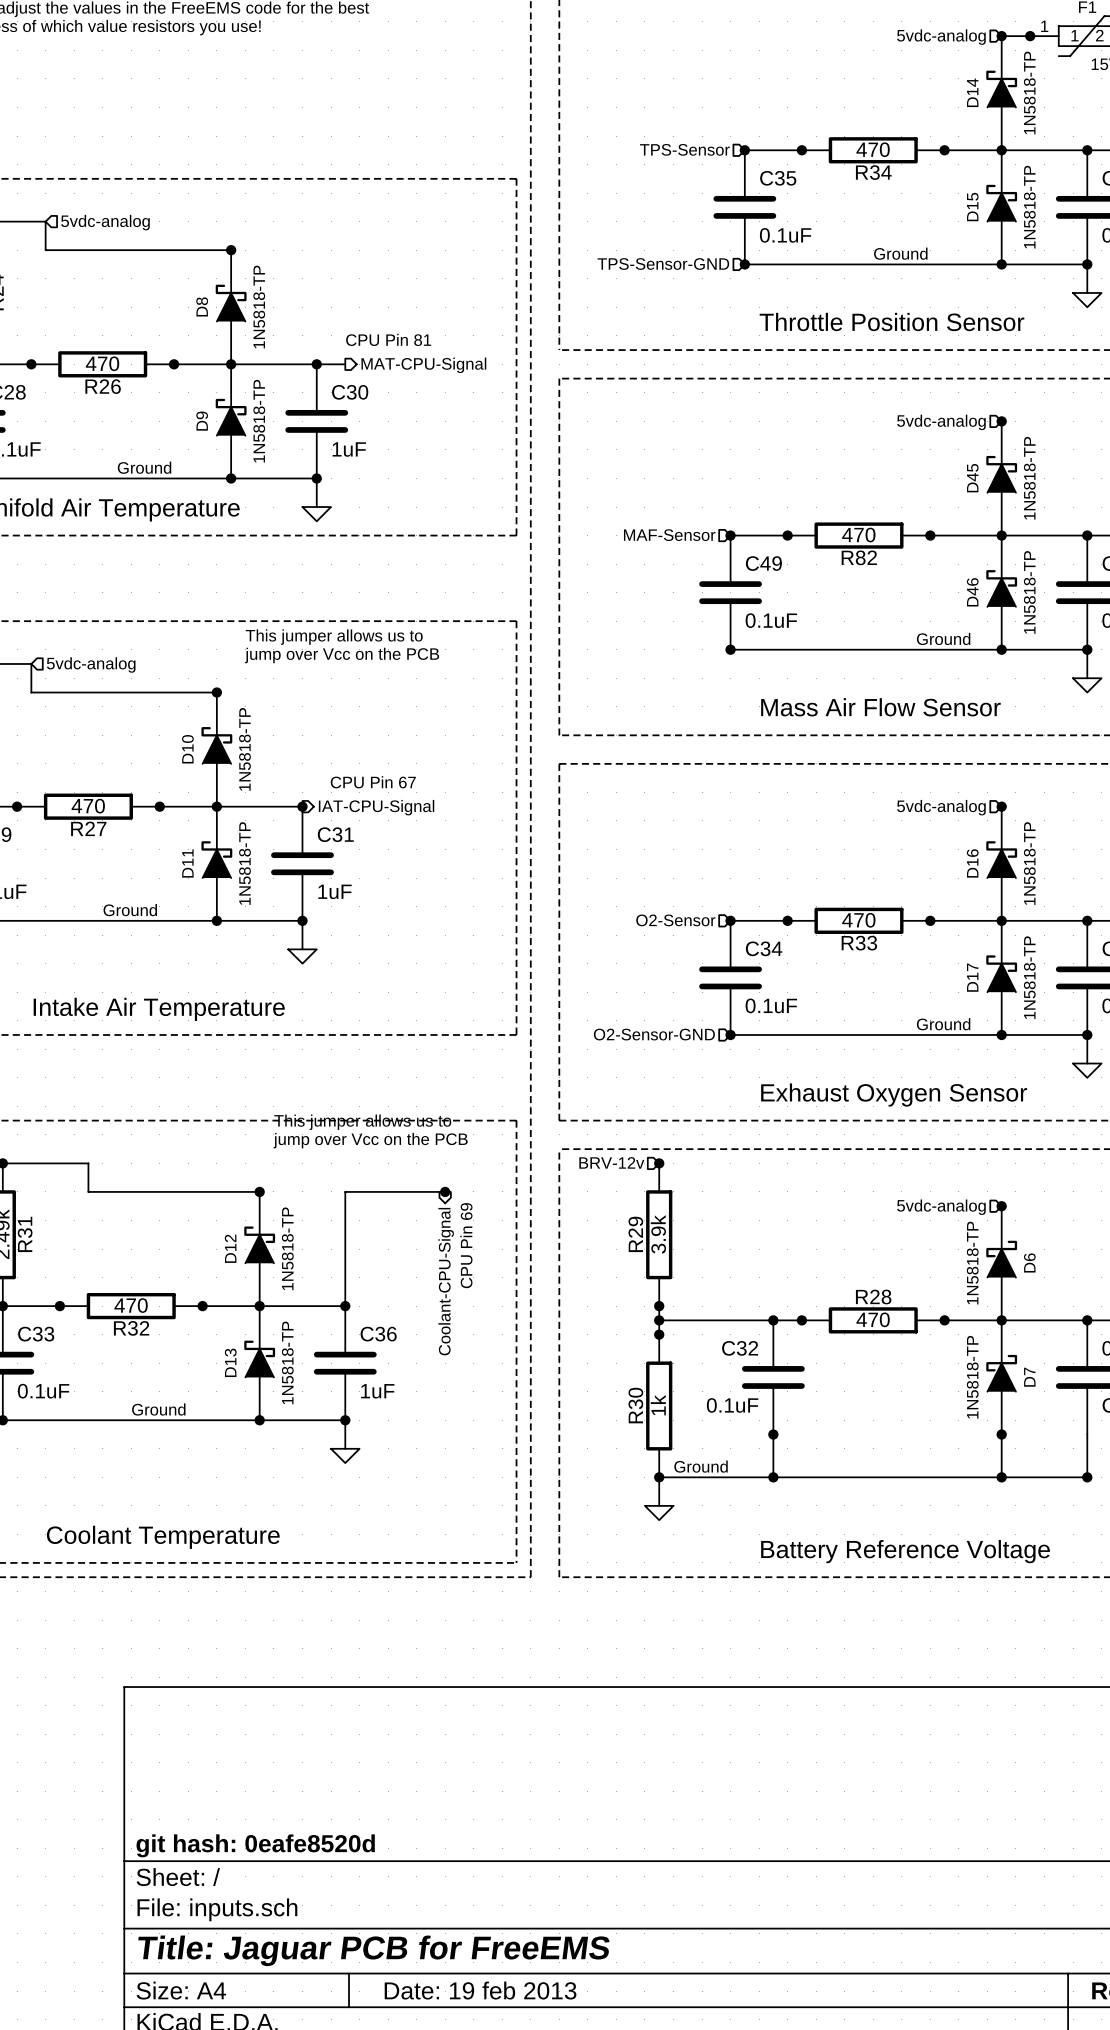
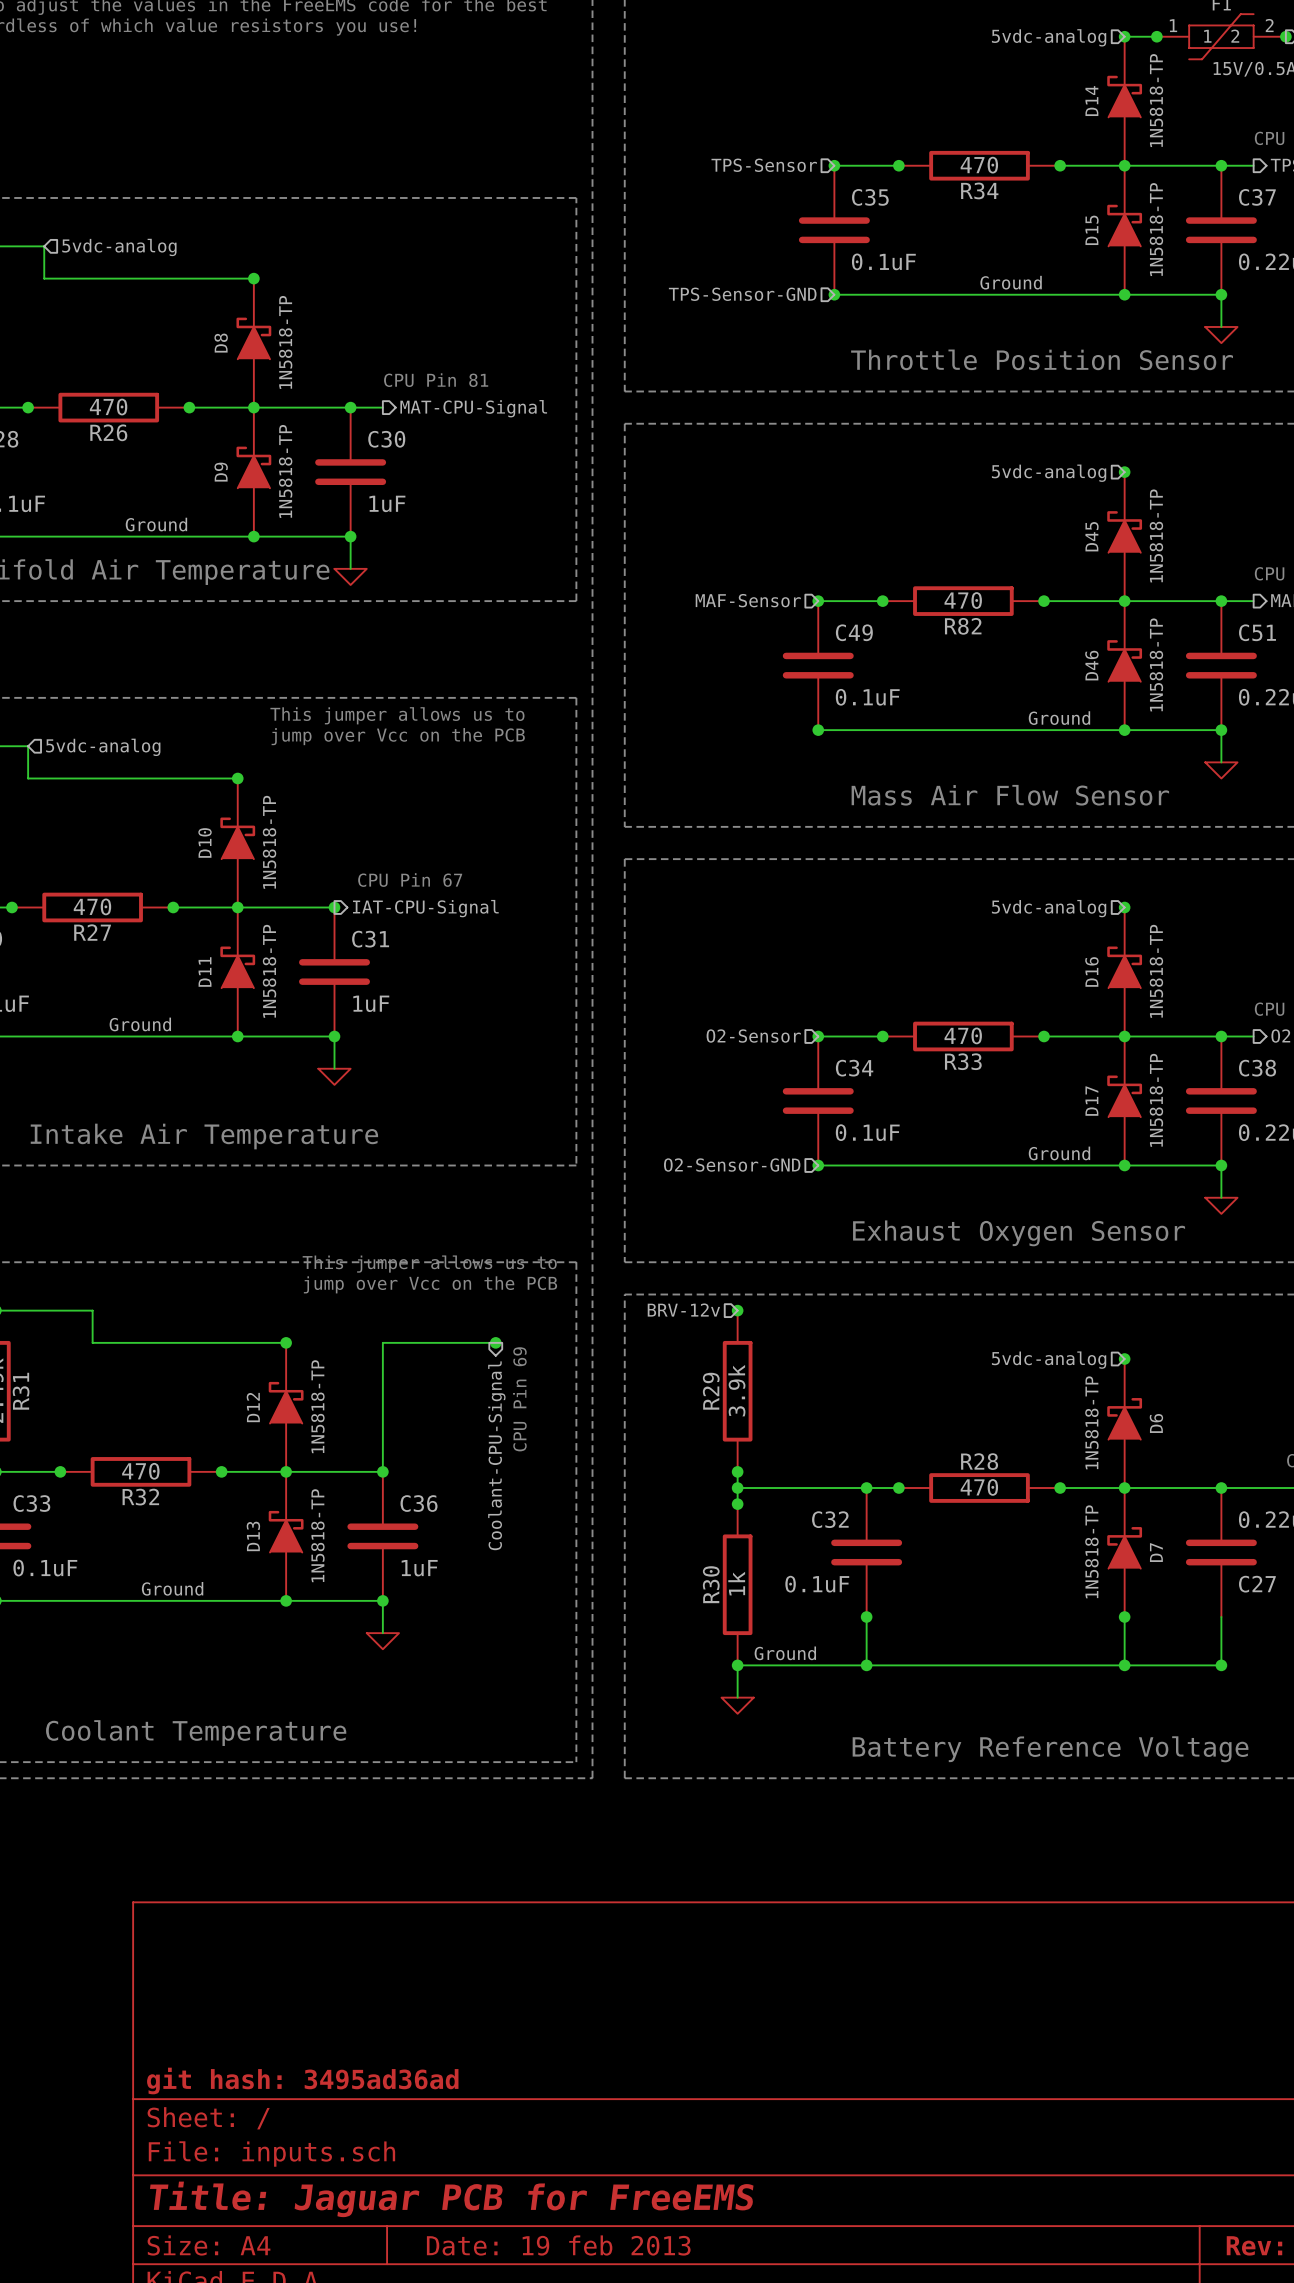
title block: git hash: 0eafe8520d (255, 1845) -> git hash: 3495ad36ad (302, 2080)

